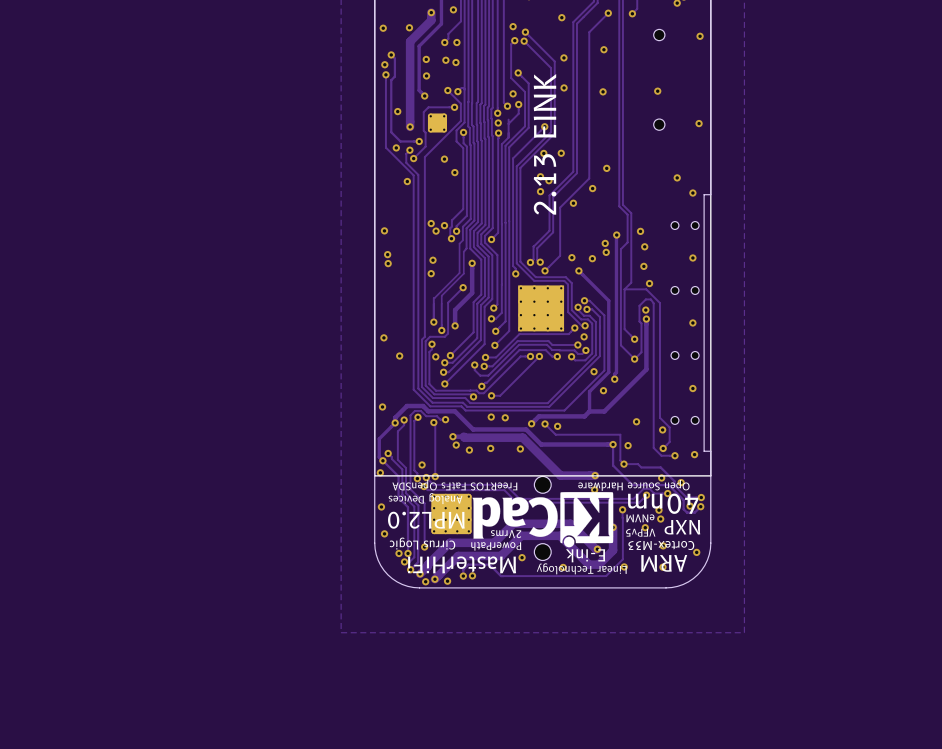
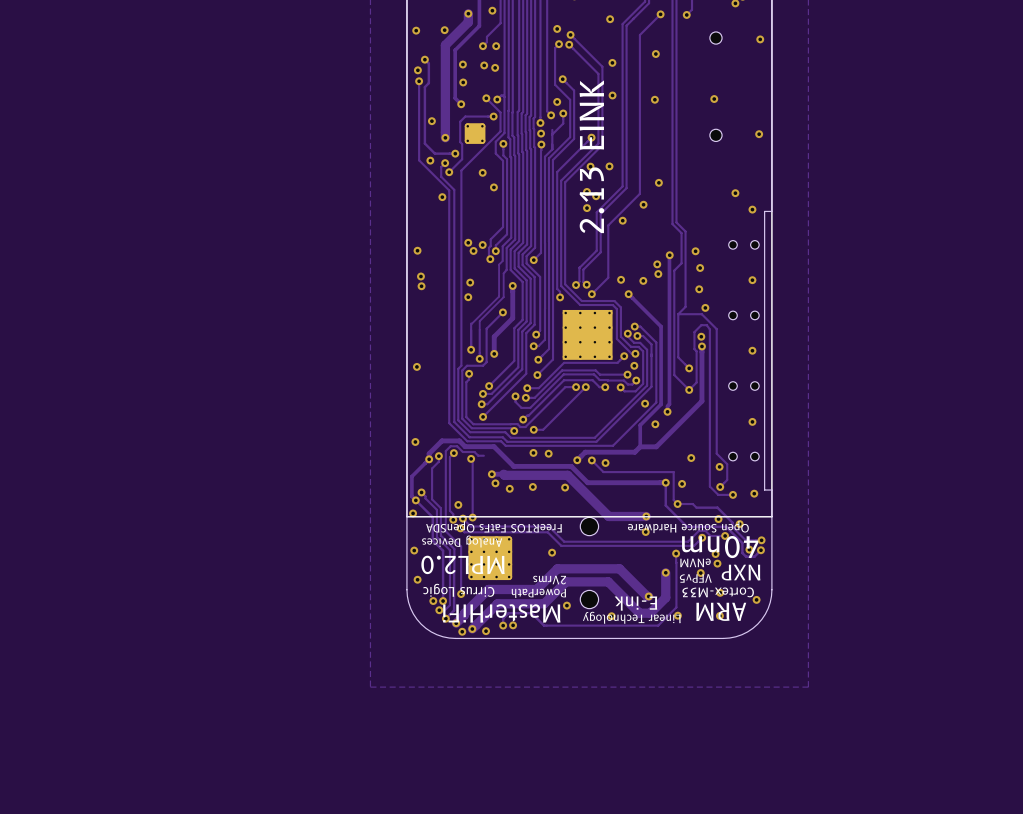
via: (399, 356) -> none
via: (435, 356) -> none
via: (445, 419) -> none
drawing: [472, 492, 614, 548] -> none

